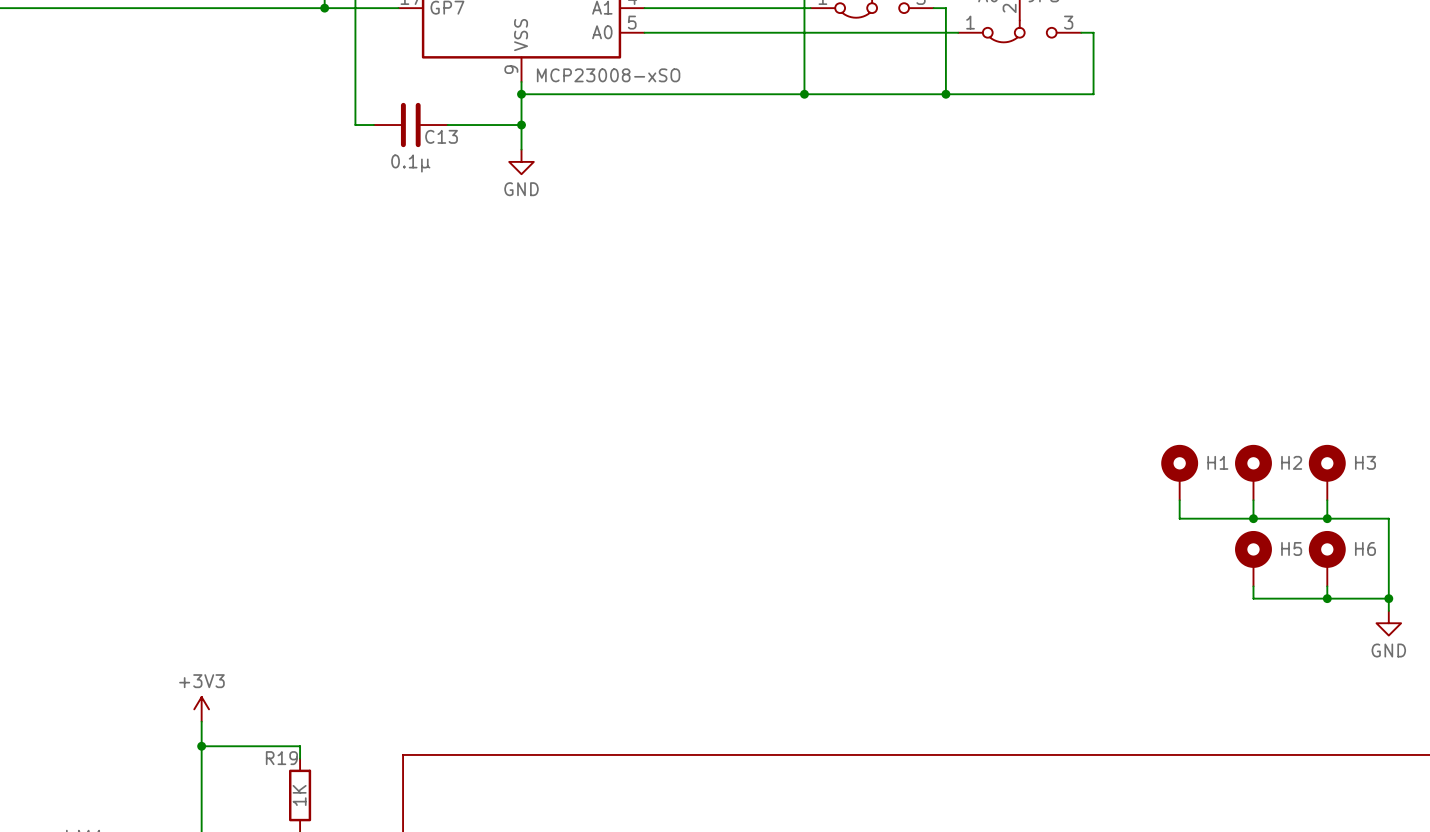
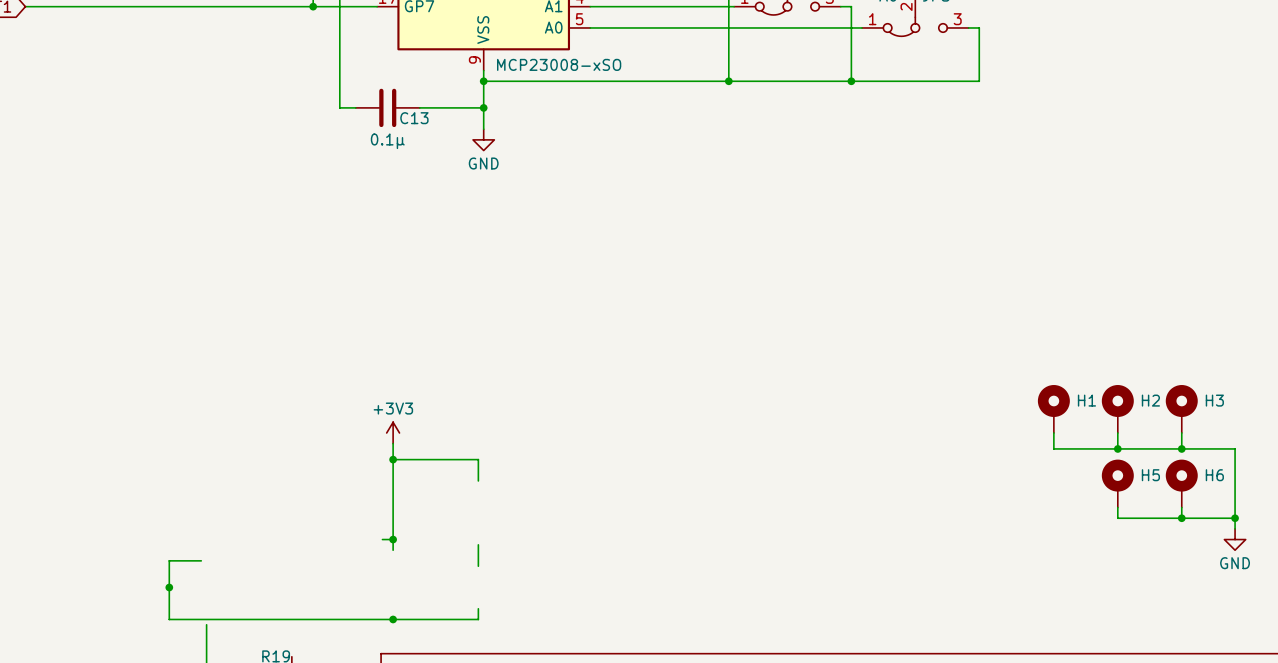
power symbol: none -> +3V3 (393, 432)
wire: none -> (393, 443) (393, 550)
wire: none -> (393, 459) (478, 459) (478, 480)
junction: none -> (393, 459)
wire: none -> (382, 539) (393, 539)
junction: none -> (393, 539)
wire: none -> (478, 544) (478, 566)
wire: none -> (201, 560) (169, 560) (169, 619) (478, 619) (478, 608)
junction: none -> (169, 587)
power symbol: +3V3 (201, 709) -> none
junction: none -> (393, 619)
wire: (201, 746) (300, 746) (300, 758) -> none
junction: (201, 746) -> none

